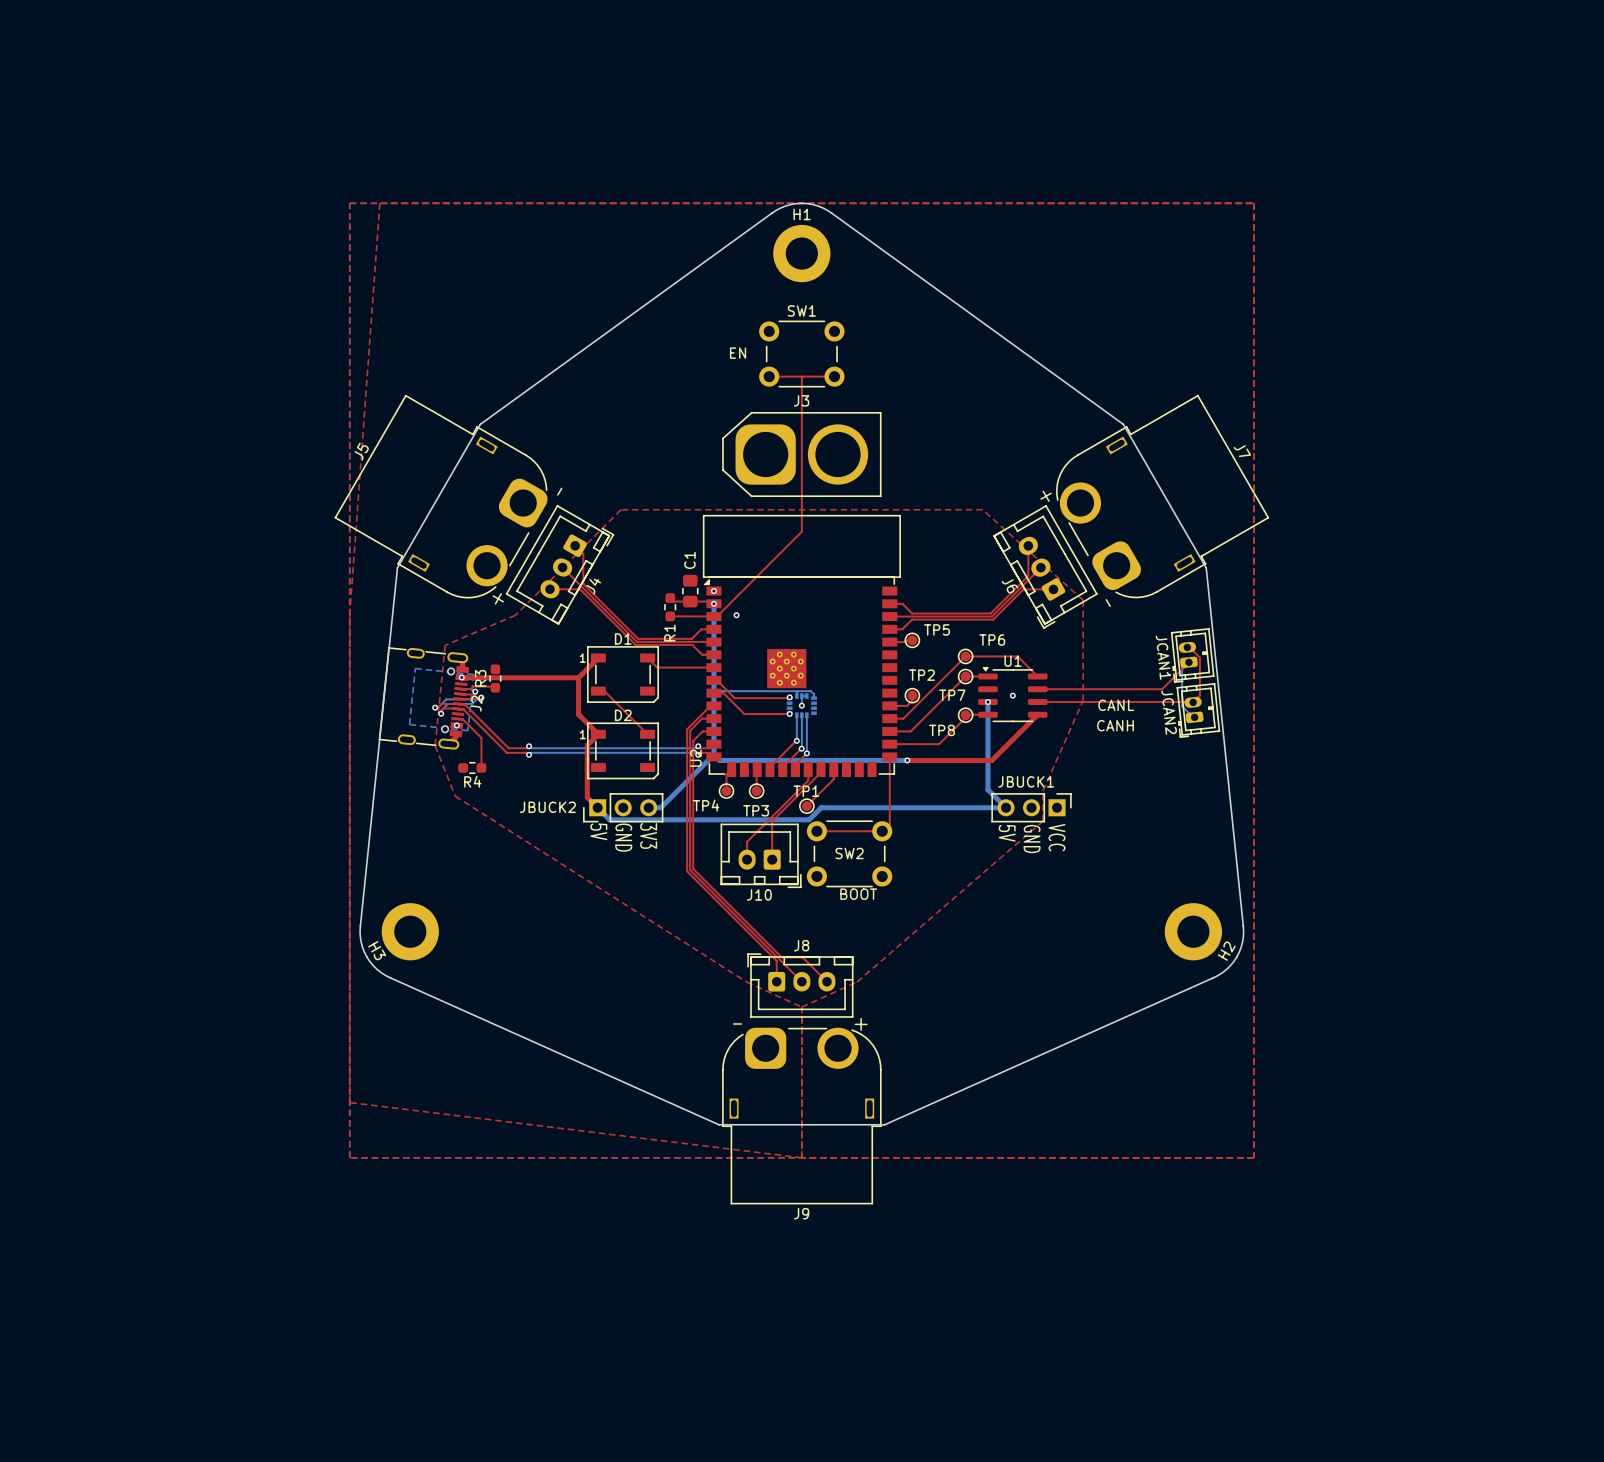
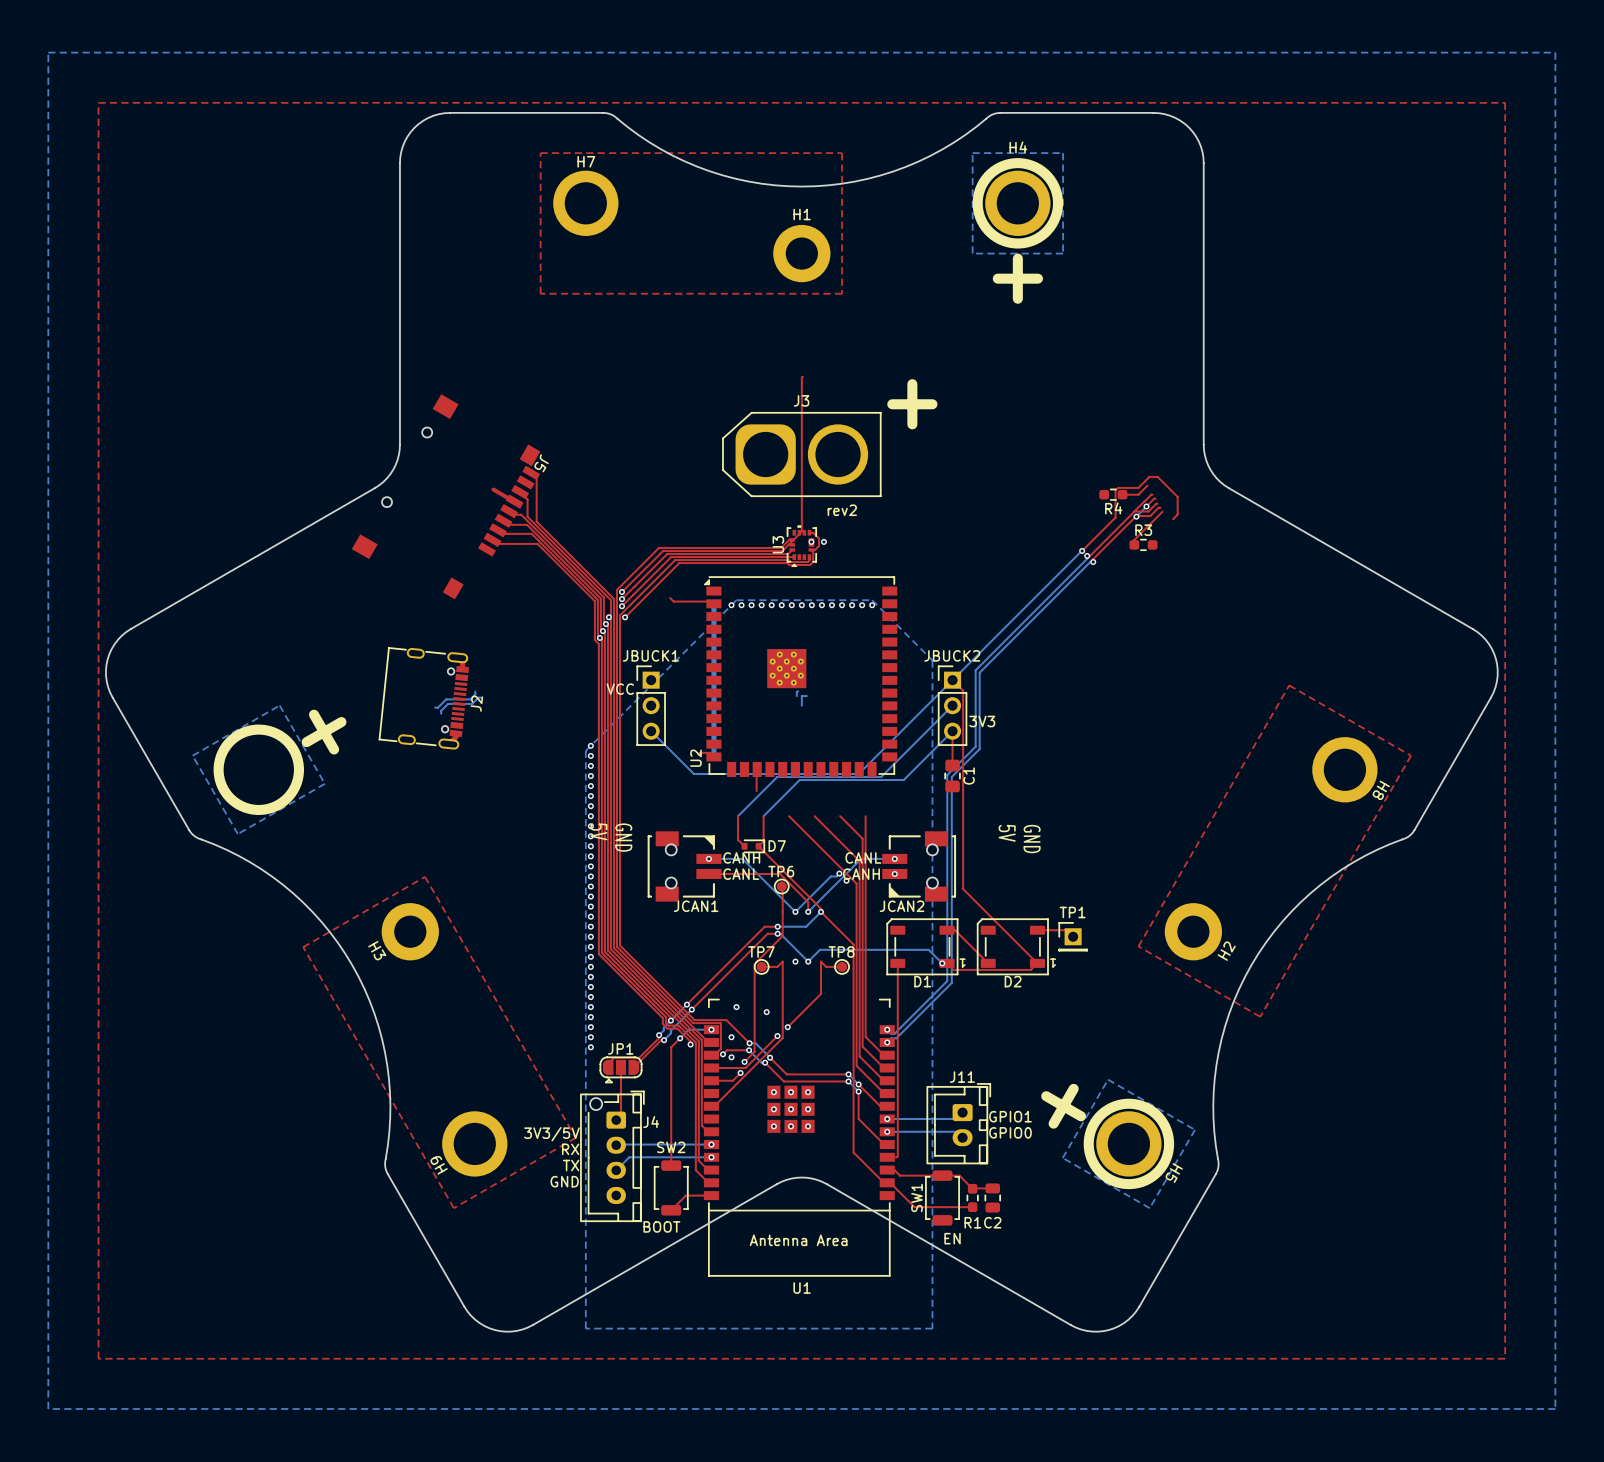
bottom zone outline: none -> (48, 52) (1555, 52) (1555, 1408) (48, 1408) (48, 52)
top zone outline: none -> (98, 102) (1505, 102) (1505, 1358) (98, 1358) (98, 102)
board edge: none -> (450, 112) (607, 113) (614, 116) (661, 149) (697, 166) (748, 181) (801, 186) (855, 181) (906, 166) (942, 149) (989, 116) (996, 113) (1153, 112) (1175, 117) (1184, 123) (1196, 136) (1203, 157) (1203, 444) (1206, 460) (1210, 469) (1220, 481) (1228, 488) (1472, 628) (1485, 639) (1491, 648) (1497, 670) (1493, 692) (1413, 831) (1405, 838) (1353, 862) (1320, 884) (1282, 921) (1251, 965) (1229, 1013) (1216, 1065) (1213, 1105) (1218, 1162) (1217, 1170) (1139, 1306) (1128, 1319) (1119, 1325) (1097, 1331) (1075, 1327) (826, 1184) (817, 1179) (801, 1177) (786, 1179) (776, 1184) (527, 1327) (505, 1331) (489, 1328) (479, 1323) (464, 1306) (386, 1170) (385, 1162) (390, 1105) (387, 1065) (374, 1013) (352, 965) (321, 921) (282, 884) (249, 862) (197, 838) (191, 833) (112, 697) (106, 681) (106, 664) (114, 644) (126, 631) (374, 488) (387, 478) (393, 469) (398, 455) (399, 444) (400, 157) (404, 141) (414, 127) (433, 115) (450, 112)
top zone outline: none -> (540, 153) (842, 153) (842, 293) (540, 293) (540, 153)
bottom zone outline: none -> (972, 153) (1063, 153) (1063, 253) (972, 253) (972, 153)
drawing: none -> [972, 158, 1064, 249]
top zone outline: (349, 203) (349, 1157) (1253, 1157) (1253, 203) (349, 203) -> none
top zone outline: (379, 203) (349, 615) -> none
H7: none -> (585, 203)
board edge: (801, 203) (785, 205) (771, 213) (480, 424) (397, 567) (360, 936) (362, 947) (369, 961) (385, 975) (718, 1124) (884, 1124) (1217, 975) (1230, 965) (1236, 956) (1242, 941) (1243, 925) (1206, 567) (1123, 424) (831, 213) (817, 205) (801, 203) -> none
H4: none -> (1017, 203)
line: none -> (1017, 258) (1017, 298)
line: none -> (997, 278) (1037, 278)
SW1 name position: SW1 (801, 310) -> SW1 (917, 1197)
SW1 footprint: [759, 320, 845, 388] -> [925, 1170, 960, 1226]
text: EN (738, 353) -> none
top track: (769, 376) (834, 376) -> none
line: none -> (912, 384) (912, 424)
J5 footprint: [334, 395, 548, 599] -> [351, 394, 541, 600]
line: none -> (892, 404) (932, 404)
J5 name position: J5 (361, 451) -> J5 (541, 463)
top track: none -> (531, 472) (536, 478) (536, 521) (613, 598) (613, 948) (708, 1042) (711, 1042)
top track: none -> (1147, 485) (1138, 494) (1122, 494)
top track: none -> (493, 489) (514, 501)
top track: none -> (520, 492) (527, 499) (527, 516) (610, 600) (610, 615) (608, 617) (610, 619) (610, 949) (701, 1040) (701, 1125) (708, 1131) (711, 1131)
top track: none -> (1152, 494) (1134, 511)
J7: (1162, 496) -> none
top track: none -> (1155, 498) (1146, 506)
top track: none -> (1157, 503) (1148, 511) (1134, 511) (1090, 555) (1087, 555)
J4 footprint: [506, 505, 614, 625] -> [580, 1090, 645, 1222]
bottom track: none -> (1146, 506) (1136, 516)
via: none -> (1146, 506)
top track: none -> (1160, 507) (1150, 516) (1136, 516) (1093, 559) (1093, 562)
text: none -> rev2 (842, 510)
top track: none -> (509, 511) (512, 514) (521, 514) (603, 597) (603, 622) (607, 626) (607, 950) (698, 1041) (698, 1160) (708, 1170) (711, 1170)
top track: none -> (1162, 511) (1134, 540) (1134, 544)
line: (703, 515) (900, 515) (900, 577) (703, 577) (703, 515) -> none
via: none -> (1136, 516)
top track: none -> (1173, 519) (1177, 514) (1177, 496) (1157, 476) (1149, 476) (1138, 487) (1118, 487) (1115, 490) (1115, 517) (1082, 550)
top track: none -> (503, 520) (507, 524) (527, 524) (600, 598) (600, 629) (604, 633) (604, 951) (672, 1019)
top track: none -> (498, 530) (501, 533) (531, 533) (597, 599) (597, 635) (601, 639) (601, 953) (665, 1016) (665, 1022) (668, 1025) (678, 1025) (695, 1042) (695, 1170) (708, 1182) (711, 1182)
top track: none -> (809, 532) (813, 532) (818, 538) (818, 546) (815, 549) (811, 549) (813, 561) (810, 565) (789, 565) (787, 563) (679, 563) (625, 617)
top track: none -> (492, 539) (496, 543) (537, 543) (594, 601) (594, 640) (598, 644) (598, 954) (662, 1018) (662, 1023) (667, 1028) (677, 1028) (690, 1041) (690, 1044)
top track: none -> (792, 539) (789, 539) (781, 548) (658, 548) (616, 589) (616, 946) (693, 1023) (720, 1023) (720, 1048) (714, 1055) (711, 1055)
via: none -> (811, 541)
via: none -> (823, 541)
top track: (575, 545) (583, 553) (583, 584) (638, 638) (691, 638) (701, 629) (713, 629) -> none
top track: (1028, 545) (1028, 575) (990, 613) (912, 613) (902, 603) (889, 603) -> none
U3: none -> (801, 546)
top track: none -> (792, 549) (788, 554) (667, 554) (634, 586)
bottom track: none -> (1082, 550) (858, 774) (693, 774) (651, 731)
via: none -> (1082, 550)
top track: (782, 551) (716, 616) (670, 616) -> (782, 551) (663, 551) (647, 567)
bottom track: none -> (1087, 555) (1087, 558) (975, 670) (975, 746) (947, 775) (947, 981) (894, 1033) (891, 1033) (887, 1029)
via: none -> (1087, 555)
top track: none -> (794, 557) (671, 557) (633, 595)
top track: none -> (809, 557) (808, 561) (790, 561) (788, 560) (675, 560) (619, 615) (619, 945) (694, 1020) (726, 1020) (749, 1043)
C1 name position: C1 (689, 560) -> C1 (969, 776)
bottom track: none -> (1093, 562) (1090, 562) (979, 672) (979, 749) (951, 776) (951, 982) (896, 1038) (891, 1038) (887, 1042)
via: none -> (1093, 562)
top track: (562, 567) (636, 641) (713, 642) -> none
top track: none -> (646, 567) (622, 592)
top track: (1040, 567) (992, 616) (889, 616) -> none
J6: (1045, 567) -> none
J4 name position: J4 (593, 586) -> J4 (651, 1122)
top track: none -> (634, 586) (622, 599)
top track: (550, 589) (580, 589) (635, 644) (692, 644) (702, 654) (713, 654) -> none
top track: (1053, 589) (1023, 589) (993, 619) (912, 619) (902, 629) (889, 629) -> none
C1 position: (690, 591) -> (952, 776)
via: (713, 591) -> none
via: none -> (622, 592)
top track: none -> (633, 595) (622, 606)
via: none -> (622, 599)
bottom zone outline: none -> (736, 600) (585, 750) (585, 1328) (932, 1328) (932, 660) (872, 600) (736, 600)
via: (713, 603) -> none
via: none -> (731, 605)
via: none -> (741, 605)
via: none -> (751, 605)
via: none -> (761, 605)
via: none -> (771, 605)
via: none -> (781, 605)
via: none -> (791, 605)
via: none -> (801, 605)
via: none -> (811, 605)
via: none -> (821, 605)
via: none -> (831, 605)
via: none -> (842, 605)
via: none -> (852, 605)
via: none -> (862, 605)
via: none -> (872, 605)
via: none -> (622, 606)
R1 position: (670, 607) -> (972, 1197)
via: (736, 615) -> none
via: none -> (608, 617)
via: none -> (625, 617)
via: none -> (605, 624)
JCAN1 footprint: [1171, 628, 1215, 683] -> [647, 831, 722, 902]
via: none -> (602, 631)
R1 name rotation: 0° (669, 633) -> 90° clockwise (972, 1222)
via: none -> (599, 637)
top track: (912, 640) (889, 642) -> none
TP5: (912, 640) -> none
TP6 name position: TP6 (992, 640) -> TP6 (781, 871)
top track: (1187, 647) (1199, 657) (1199, 695) (1193, 702) (1037, 702) -> none
TP6 position: (965, 656) -> (781, 886)
top track: (598, 657) (578, 677) -> none
top track: (647, 657) (657, 667) (713, 667) -> none
JCAN1 name position: JCAN1 (1163, 657) -> JCAN1 (696, 906)
U1 name position: U1 (1013, 661) -> U1 (802, 1288)
top track: (1188, 662) (1162, 689) (1037, 689) -> none
bottom track: (1188, 662) (1182, 669) (1182, 706) (1194, 717) -> none
U1 footprint: [978, 666, 1048, 722] -> [703, 998, 895, 1277]
bottom zone outline: (415, 668) (409, 724) (467, 730) (473, 674) (415, 668) -> none
D1 rotation: 0° (623, 674) -> 180° (922, 946)
D1 position: (623, 674) -> (922, 946)
TP7 position: (965, 676) -> (761, 966)
top track: (987, 676) (965, 676) (910, 731) (889, 731) -> none
top track: (1037, 676) (1017, 656) (965, 656) (903, 718) (889, 718) -> none
top track: (461, 677) (578, 677) -> none
via: (461, 677) -> none
top track: (578, 677) (578, 714) (598, 734) (587, 745) (587, 797) (597, 807) -> none
R3 rotation: 0° (495, 678) -> 90° clockwise (1143, 544)
R3 position: (495, 678) -> (1143, 544)
top track: (713, 680) (716, 680) (734, 698) (789, 697) -> none
top track: none -> (952, 680) (963, 690) (963, 889) (1037, 963) (1030, 969) (953, 969) (947, 963) (942, 963)
JCAN2 footprint: [1176, 683, 1221, 738] -> [882, 831, 957, 902]
top zone outline: none -> (1289, 685) (1138, 946) (1260, 1016) (1411, 755) (1289, 685)
top track: (495, 687) (473, 686) (470, 689) (460, 689) -> none
text: none -> VCC (620, 689)
top track: (475, 691) (475, 694) (460, 693) -> none
via: (475, 691) -> none
top track: (598, 691) (604, 691) (647, 734) -> none
bottom track: (713, 691) (810, 691) (814, 694) (814, 698) -> none
top track: (713, 693) (723, 693) (744, 713) (789, 713) -> none
TP2: (912, 695) -> none
TP7 name position: TP7 (952, 695) -> TP7 (761, 951)
via: (1012, 695) -> none
top track: (481, 697) (459, 698) -> none
via: (481, 697) -> none
via: (789, 697) -> none
top track: (912, 700) (907, 705) (889, 705) -> none
bottom track: (987, 702) (987, 789) (1006, 807) (821, 807) (809, 819) (609, 819) (597, 807) -> none
via: (987, 702) -> none
bottom zone outline: none -> (279, 705) (192, 755) (237, 834) (324, 783) (279, 705)
top track: (713, 705) (710, 705) (687, 729) (687, 871) (776, 960) (776, 981) -> none
part: (801, 705) -> none
via: (801, 705) -> none
bottom track: none -> (952, 705) (881, 777) (777, 777) (738, 816)
text: CANL (1116, 705) -> none
top track: (435, 707) (441, 703) (465, 704) (508, 748) (527, 748) (529, 746) -> none
via: (435, 707) -> none
top track: (458, 708) (443, 708) (441, 713) -> none
top track: (458, 709) (463, 709) (506, 752) (527, 752) (529, 754) -> none
JCAN2 name position: JCAN2 (1169, 712) -> JCAN2 (902, 906)
via: (441, 713) -> none
via: (789, 713) -> none
line: none -> (314, 714) (334, 749)
top track: (987, 714) (968, 714) (939, 744) (889, 744) -> none
top track: (1037, 714) (992, 760) (907, 760) -> none
bottom track: (796, 715) (796, 740) -> none
bottom track: (801, 715) (801, 748) -> none
bottom track: (806, 715) (806, 753) -> none
TP8 position: (965, 715) -> (842, 966)
top track: (457, 718) (462, 718) (481, 737) (481, 767) -> none
top track: (713, 718) (702, 718) (690, 730) (690, 870) (801, 981) -> none
text: none -> 3V3 (982, 721)
line: none -> (341, 722) (306, 742)
drawing: none -> [213, 724, 305, 816]
via: (456, 725) -> none
text: CANH (1115, 725) -> none
TP8 name position: TP8 (942, 730) -> TP8 (841, 951)
top track: (713, 731) (702, 731) (693, 740) (693, 868) (781, 957) (802, 957) (826, 981) -> none
top track: none -> (952, 731) (952, 765)
bottom track: none -> (952, 731) (903, 780) (799, 780) (763, 816)
top track: (796, 740) (769, 767) (769, 769) -> none
via: (796, 740) -> none
top track: (713, 744) (709, 748) (700, 748) (698, 746) -> none
via: none -> (590, 745)
bottom track: (529, 746) (531, 748) (696, 748) (698, 746) -> none
via: (529, 746) -> none
via: (698, 746) -> none
top track: (801, 748) (782, 769) -> none
via: (801, 748) -> none
D2 rotation: 0° (623, 750) -> 180° (1012, 946)
D2 position: (623, 750) -> (1012, 946)
top track: (806, 753) (795, 764) (795, 769) -> none
via: (806, 753) -> none
bottom track: (529, 754) (531, 752) (696, 752) (698, 754) -> none
via: (529, 754) -> none
via: (698, 754) -> none
via: none -> (590, 755)
top track: (889, 756) (889, 823) (882, 831) (816, 831) -> none
bottom track: (907, 760) (719, 760) (713, 754) (660, 807) (648, 807) -> none
via: (907, 760) -> none
via: none -> (590, 765)
R4 position: (472, 767) -> (1113, 494)
top track: (731, 769) (726, 774) (726, 791) -> none
top track: (808, 769) (808, 780) (747, 841) (747, 859) -> none
top track: (820, 769) (820, 772) (772, 821) (772, 859) -> none
top track: (833, 769) (833, 779) (806, 806) -> none
H8: none -> (1344, 769)
via: none -> (590, 776)
JBUCK1 name position: JBUCK1 (1026, 781) -> JBUCK1 (650, 655)
via: none -> (590, 786)
TP4: (726, 791) -> none
TP3: (756, 791) -> none
via: none -> (590, 796)
TP1 footprint: [799, 798, 815, 814] -> [1058, 922, 1088, 952]
via: none -> (590, 806)
JBUCK2 name position: JBUCK2 (547, 807) -> JBUCK2 (952, 655)
JBUCK2 rotation: 0° (623, 807) -> 90° clockwise (952, 705)
JBUCK2 position: (623, 807) -> (952, 705)
JBUCK1 rotation: 0° (1031, 807) -> 90° counterclockwise (651, 705)
JBUCK1 position: (1031, 807) -> (651, 705)
via: none -> (590, 816)
top track: none -> (738, 816) (738, 839) (744, 846)
top track: none -> (763, 816) (763, 841) (758, 846) (853, 944) (853, 1152) (881, 1180) (885, 1180)
top track: none -> (789, 816) (856, 883) (856, 1065) (884, 1093) (887, 1093)
top track: none -> (814, 816) (859, 861) (859, 1056) (883, 1080) (887, 1080)
top track: none -> (840, 816) (862, 838) (862, 1046) (883, 1067) (887, 1067)
top track: none -> (865, 816) (865, 1036) (883, 1055) (887, 1055)
SW2 footprint: [806, 820, 893, 888] -> [654, 1160, 689, 1216]
via: none -> (590, 826)
text: 3V3 (648, 835) -> none
via: none -> (590, 836)
text: VCC (1057, 837) -> none
via: none -> (590, 846)
D7: none -> (753, 846)
SW2 name position: SW2 (849, 853) -> SW2 (671, 1147)
J10: (761, 855) -> none
via: none -> (590, 856)
text: none -> CANH (741, 857)
text: none -> CANL (863, 857)
bottom track: none -> (708, 858) (742, 858) (795, 911) (830, 876) (836, 876) (839, 873)
via: none -> (708, 858)
bottom track: none -> (894, 858) (861, 858) (808, 911)
via: none -> (894, 858)
via: none -> (590, 866)
top track: none -> (708, 873) (780, 873) (808, 902) (808, 911)
via: none -> (839, 873)
via: none -> (894, 873)
text: none -> CANL (741, 874)
text: none -> CANH (861, 874)
top zone outline: none -> (425, 876) (303, 947) (453, 1208) (575, 1137) (425, 876)
via: none -> (590, 876)
via: none -> (846, 880)
via: none -> (590, 886)
top track: none -> (781, 886) (782, 935) (754, 963) (754, 1051) (744, 1061)
text: BOOT (858, 894) -> none
via: none -> (590, 896)
via: none -> (590, 906)
via: none -> (795, 911)
via: none -> (808, 911)
bottom track: none -> (820, 911) (806, 926) (777, 926)
via: none -> (820, 911)
via: none -> (590, 916)
via: none -> (590, 926)
top track: none -> (777, 926) (764, 926) (686, 1004)
via: none -> (777, 926)
top track: none -> (947, 930) (955, 930) (988, 963)
top track: none -> (1037, 930) (1066, 930) (1073, 936)
top track: none -> (777, 933) (767, 933) (691, 1009)
bottom track: none -> (777, 933) (780, 933) (808, 961) (820, 949) (928, 949) (942, 963)
via: none -> (777, 933)
via: none -> (590, 936)
via: none -> (590, 946)
via: none -> (590, 956)
via: none -> (795, 961)
via: none -> (808, 961)
top track: none -> (897, 963) (897, 1156) (887, 1157)
via: none -> (942, 963)
via: none -> (590, 966)
top track: none -> (761, 966) (777, 966) (782, 961) (782, 1037) (714, 1106) (711, 1106)
top track: none -> (842, 966) (826, 966) (820, 961) (820, 993) (787, 1027)
via: none -> (590, 976)
J8: (800, 985) -> none
via: none -> (590, 987)
via: none -> (590, 997)
bottom track: none -> (686, 1004) (663, 1027) (663, 1030) (659, 1035)
via: none -> (686, 1004)
via: none -> (590, 1007)
via: none -> (736, 1007)
top zone outline: (801, 1007) (746, 981) (455, 796) (435, 745) (445, 645) (515, 615) (621, 509) (982, 509) (1083, 600) (1083, 700) (1042, 791) (1042, 821) (857, 981) (801, 1007) -> none
top zone outline: (801, 1007) (801, 1157) (349, 1102) -> none
bottom track: none -> (691, 1009) (664, 1040)
via: none -> (691, 1009)
via: none -> (766, 1012)
via: none -> (590, 1017)
via: none -> (670, 1020)
via: none -> (590, 1027)
via: none -> (787, 1027)
bottom track: none -> (711, 1029) (688, 1029) (680, 1038)
via: none -> (711, 1029)
via: none -> (887, 1029)
top track: none -> (659, 1035) (659, 1038) (639, 1057) (614, 1057) (607, 1063) (607, 1067)
via: none -> (659, 1035)
top track: none -> (777, 1036) (745, 1067) (711, 1067)
via: none -> (777, 1036)
via: none -> (590, 1037)
via: none -> (731, 1037)
top track: none -> (680, 1038) (671, 1047) (671, 1165)
via: none -> (680, 1038)
top track: none -> (664, 1040) (661, 1040) (634, 1067)
via: none -> (664, 1040)
via: none -> (887, 1042)
bottom track: none -> (749, 1043) (755, 1043) (770, 1057)
via: none -> (749, 1043)
via: none -> (690, 1044)
via: none -> (590, 1047)
top track: none -> (749, 1050) (727, 1050) (722, 1054)
bottom track: none -> (749, 1050) (761, 1062) (765, 1062)
via: none -> (749, 1050)
via: none -> (722, 1054)
via: none -> (731, 1057)
top track: none -> (770, 1057) (786, 1074) (848, 1074)
via: none -> (770, 1057)
via: none -> (744, 1061)
top track: none -> (765, 1062) (783, 1081) (848, 1081)
via: none -> (765, 1062)
top track: none -> (621, 1067) (621, 1115) (616, 1120)
JP1: none -> (621, 1069)
top track: none -> (740, 1073) (732, 1080) (711, 1080)
via: none -> (740, 1073)
bottom track: none -> (848, 1074) (858, 1084)
via: none -> (848, 1074)
bottom zone outline: none -> (1108, 1079) (1062, 1157) (1149, 1208) (1195, 1129) (1108, 1079)
bottom track: none -> (848, 1081) (858, 1091)
via: none -> (848, 1081)
top track: none -> (858, 1084) (880, 1106) (887, 1106)
via: none -> (858, 1084)
line: none -> (1073, 1088) (1053, 1123)
top track: none -> (858, 1091) (858, 1118) (884, 1144) (887, 1144)
via: none -> (858, 1091)
via: none -> (773, 1092)
via: none -> (791, 1092)
via: none -> (808, 1092)
line: none -> (1046, 1096) (1081, 1116)
drawing: none -> [1083, 1098, 1175, 1190]
via: none -> (773, 1109)
via: none -> (791, 1109)
via: none -> (808, 1109)
bottom track: none -> (962, 1112) (956, 1119) (887, 1119)
J9: (801, 1115) -> none
text: none -> GPIO1 (1010, 1116)
via: none -> (887, 1119)
J11: none -> (958, 1123)
via: none -> (773, 1126)
via: none -> (791, 1126)
via: none -> (808, 1126)
bottom track: none -> (887, 1131) (956, 1131) (962, 1137)
via: none -> (887, 1131)
text: none -> GPIO0 (1010, 1132)
text: none -> 3V3/5V (551, 1134)
H9: none -> (474, 1143)
H5: none -> (1128, 1143)
bottom track: none -> (711, 1144) (616, 1145)
via: none -> (711, 1144)
text: none -> RX (570, 1149)
bottom track: none -> (711, 1157) (629, 1157) (616, 1170)
via: none -> (711, 1157)
text: none -> TX (571, 1165)
top track: none -> (887, 1170) (894, 1170) (900, 1175) (959, 1175) (972, 1188) (992, 1188)
text: none -> GND (564, 1181)
top track: none -> (887, 1182) (890, 1182) (914, 1207) (972, 1207)
top track: none -> (711, 1195) (685, 1195) (671, 1210)
C2: none -> (992, 1197)
text: none -> BOOT (661, 1226)
text: none -> EN (952, 1238)

